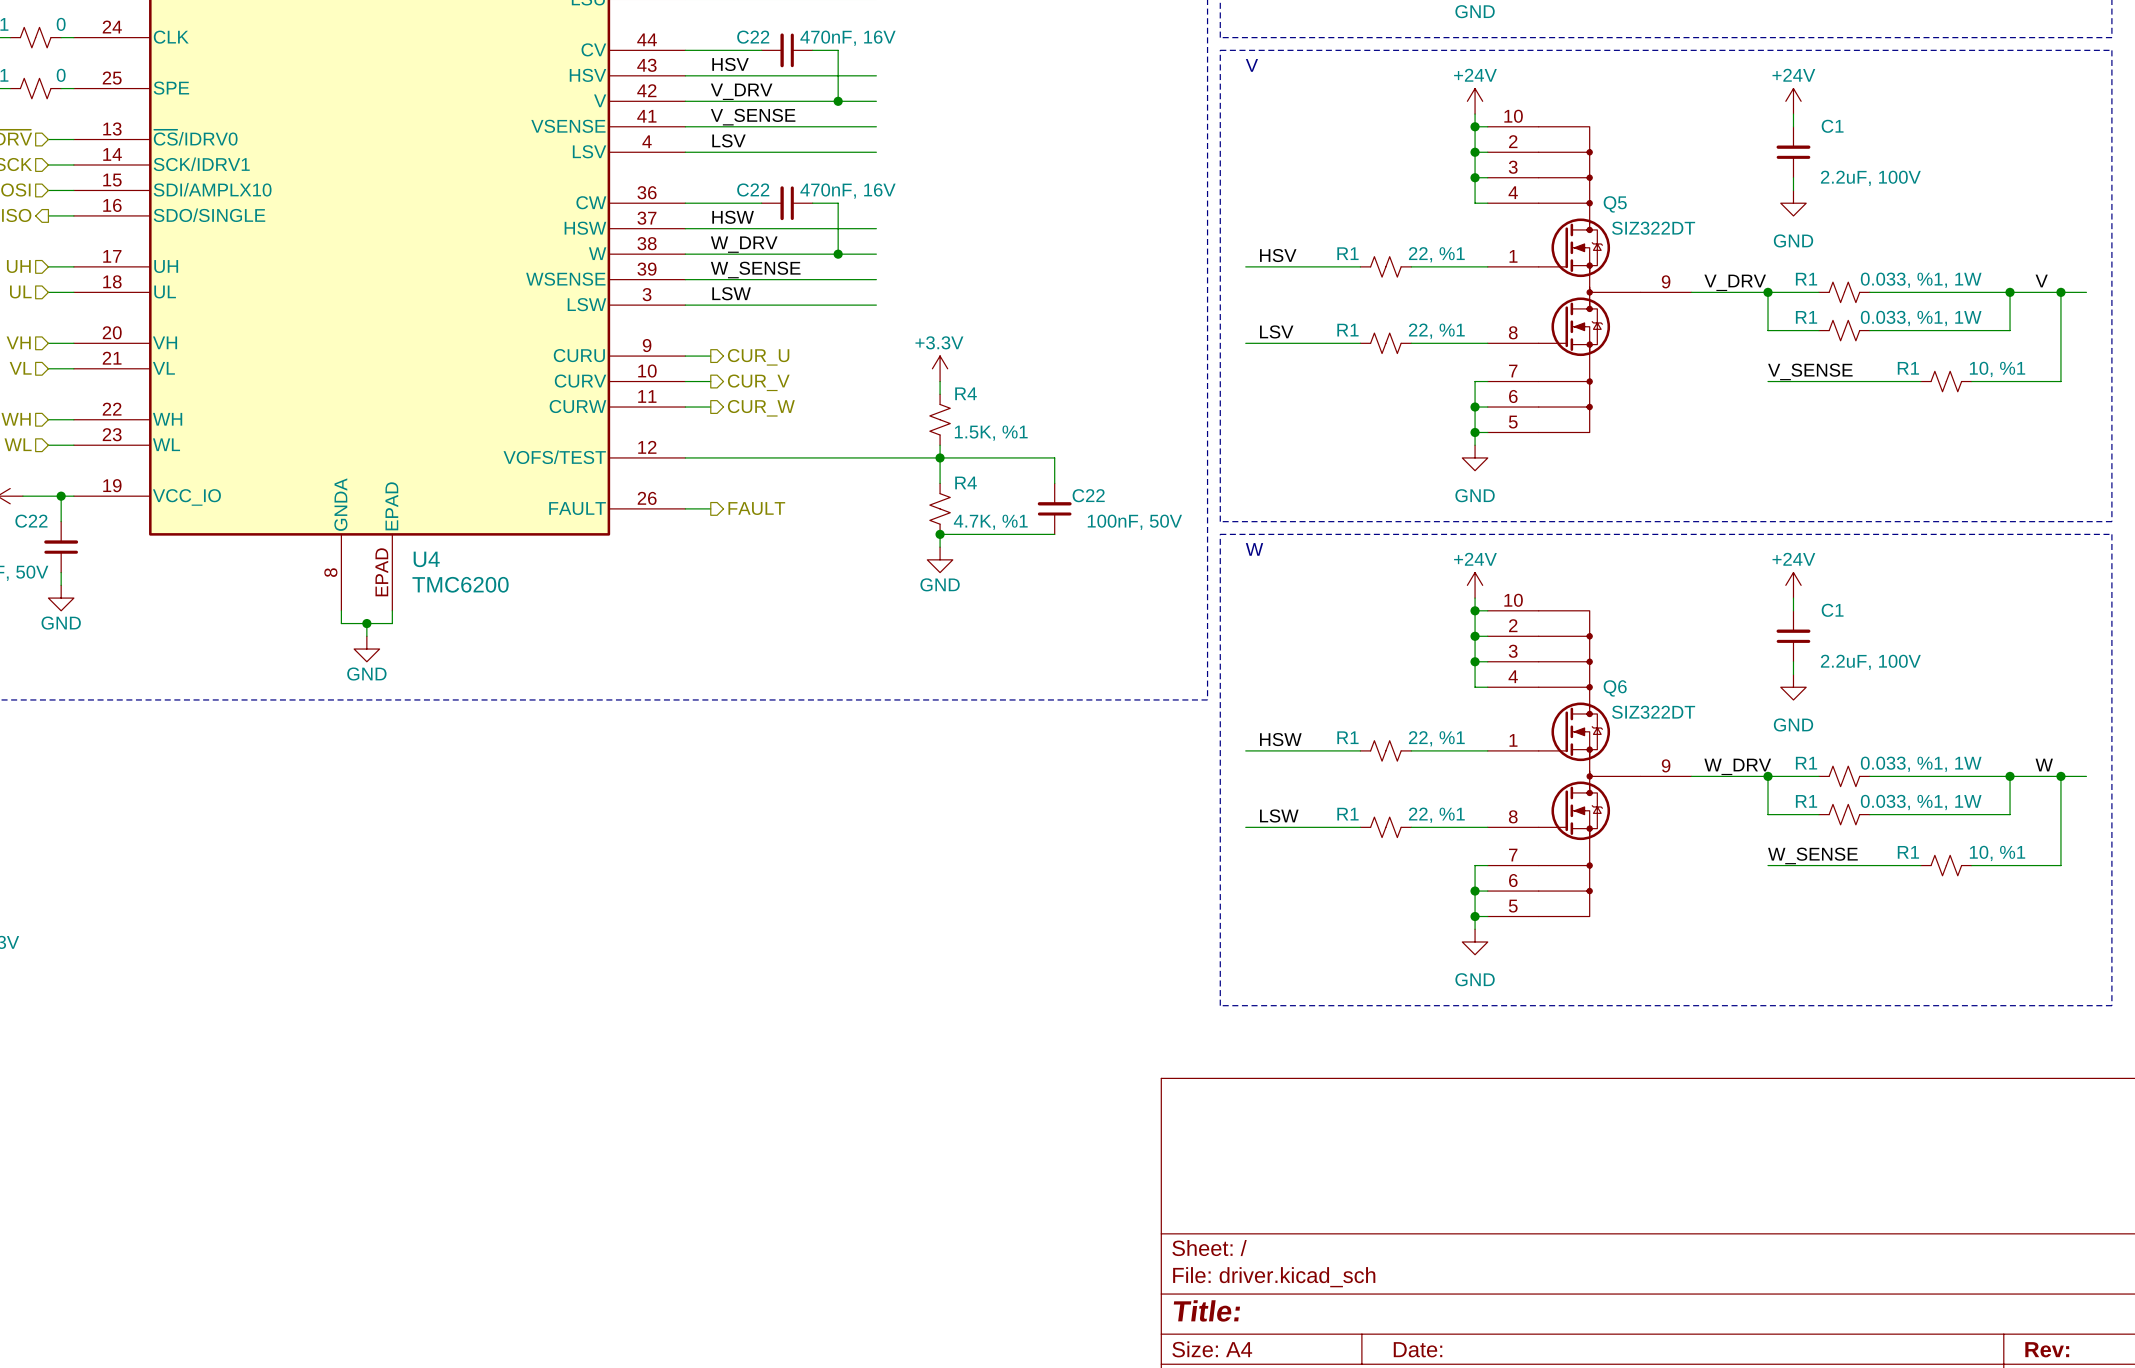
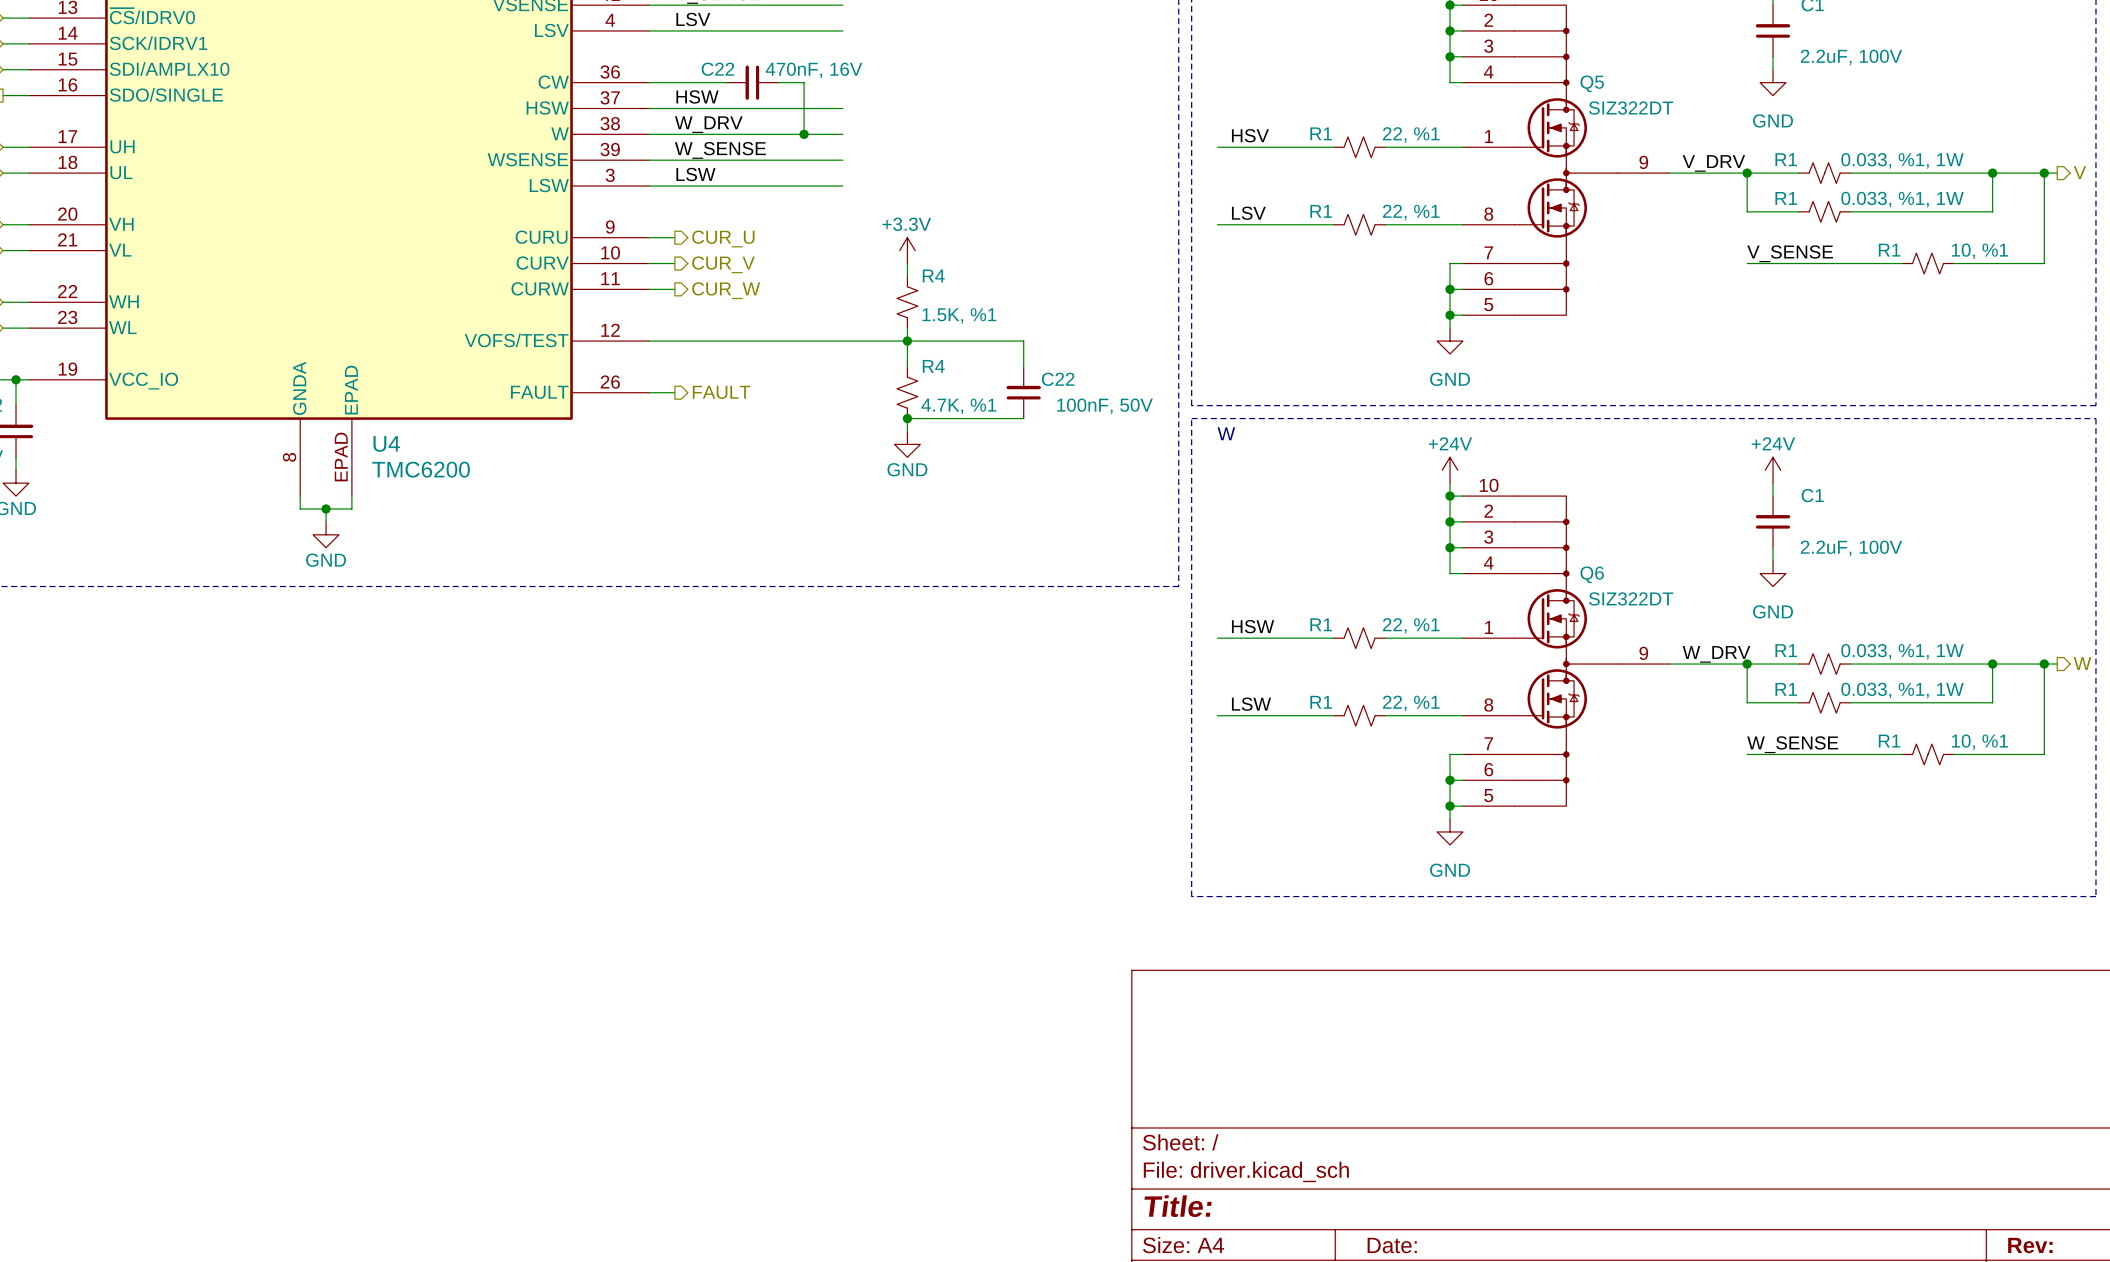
label: V (2041, 281) -> none
hierarchical label: none -> V (2079, 172)
wire: (2073, 292) (2086, 292) -> none
label: W (2044, 765) -> none
hierarchical label: none -> W (2082, 663)
wire: (2073, 776) (2086, 776) -> none

